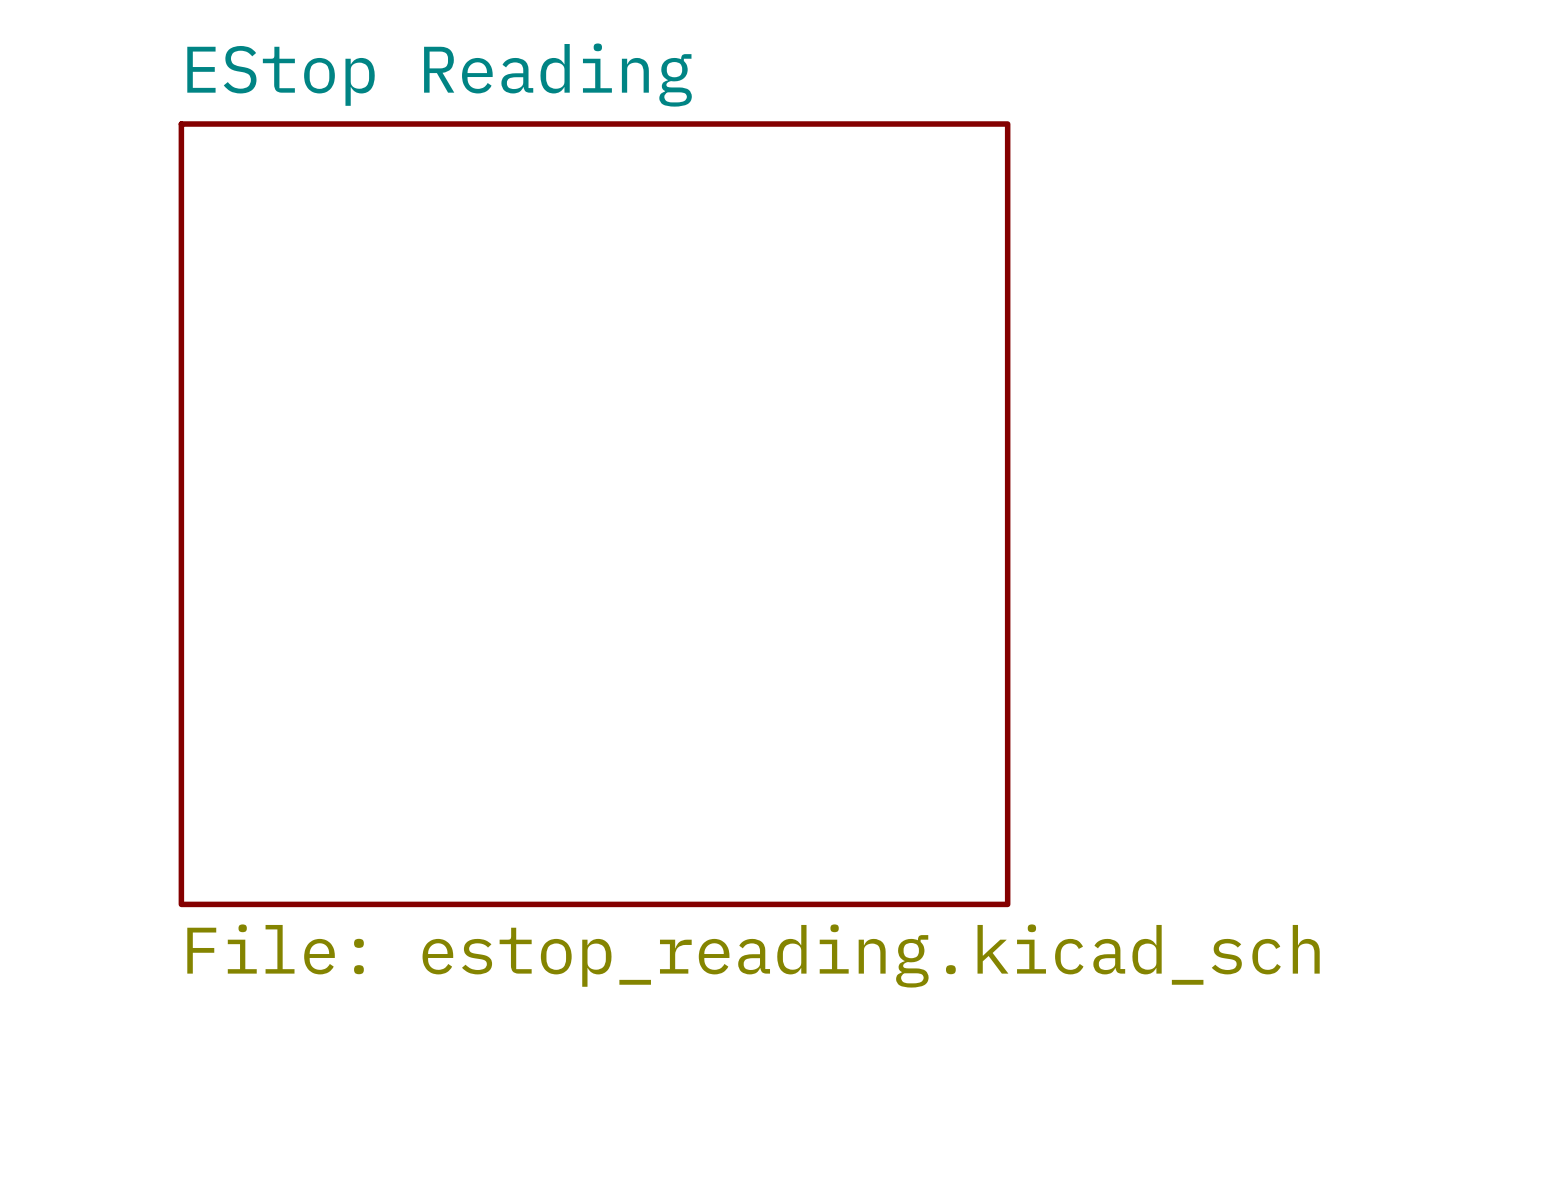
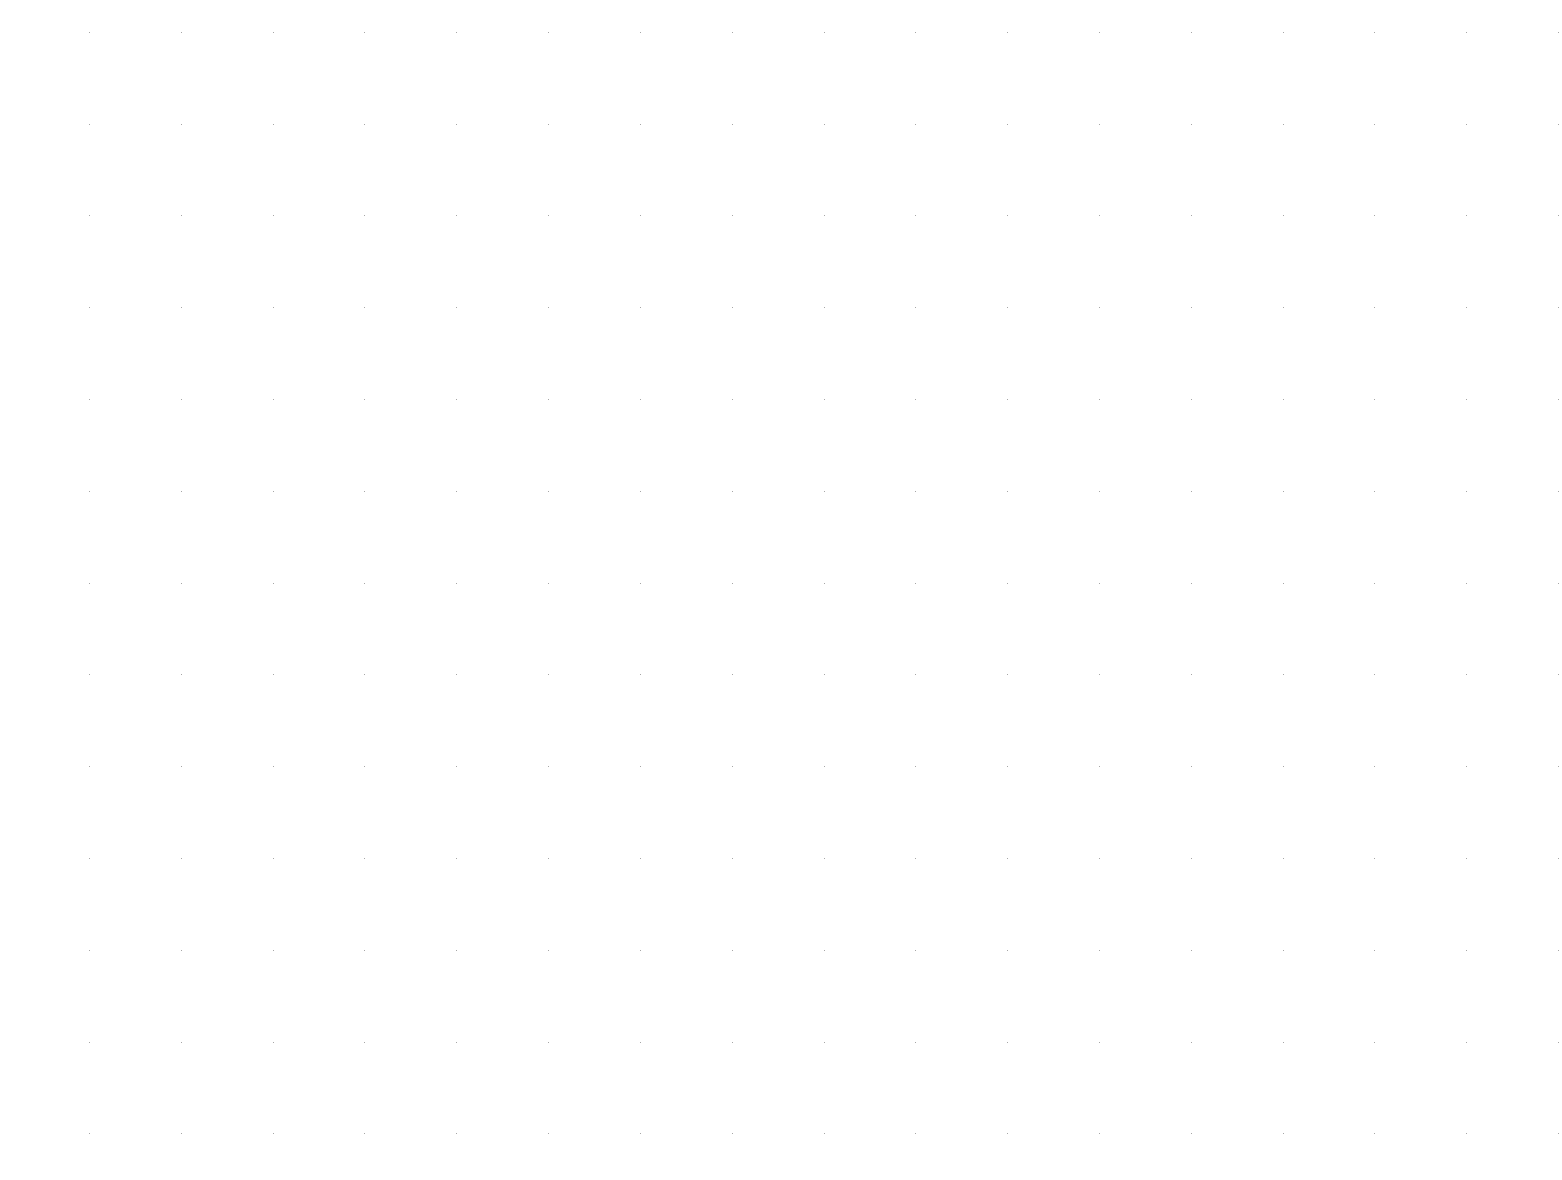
sheet EStop Reading: File: estop_reading.kicad_sch (594, 514) -> none

